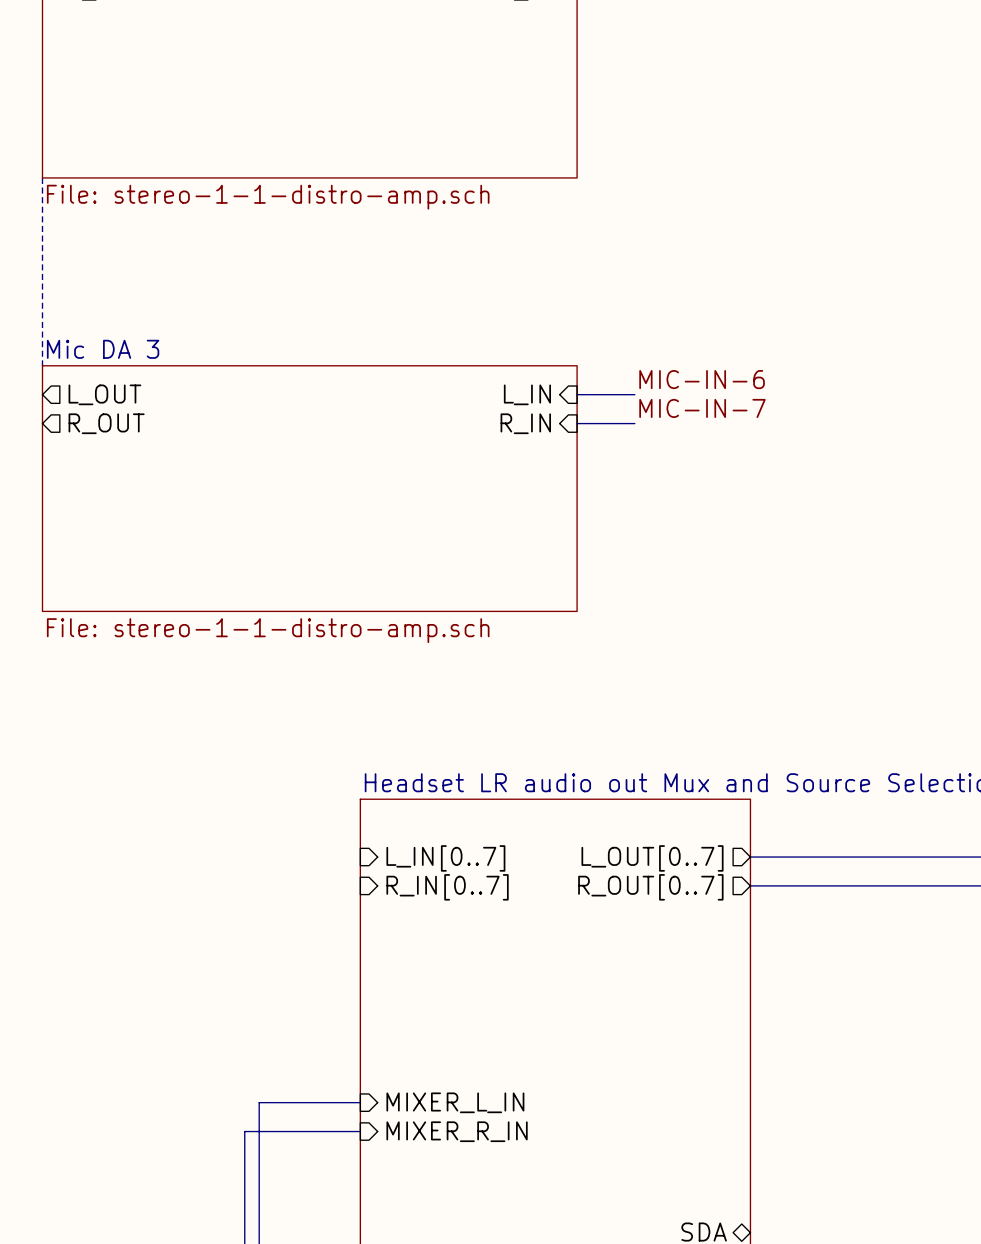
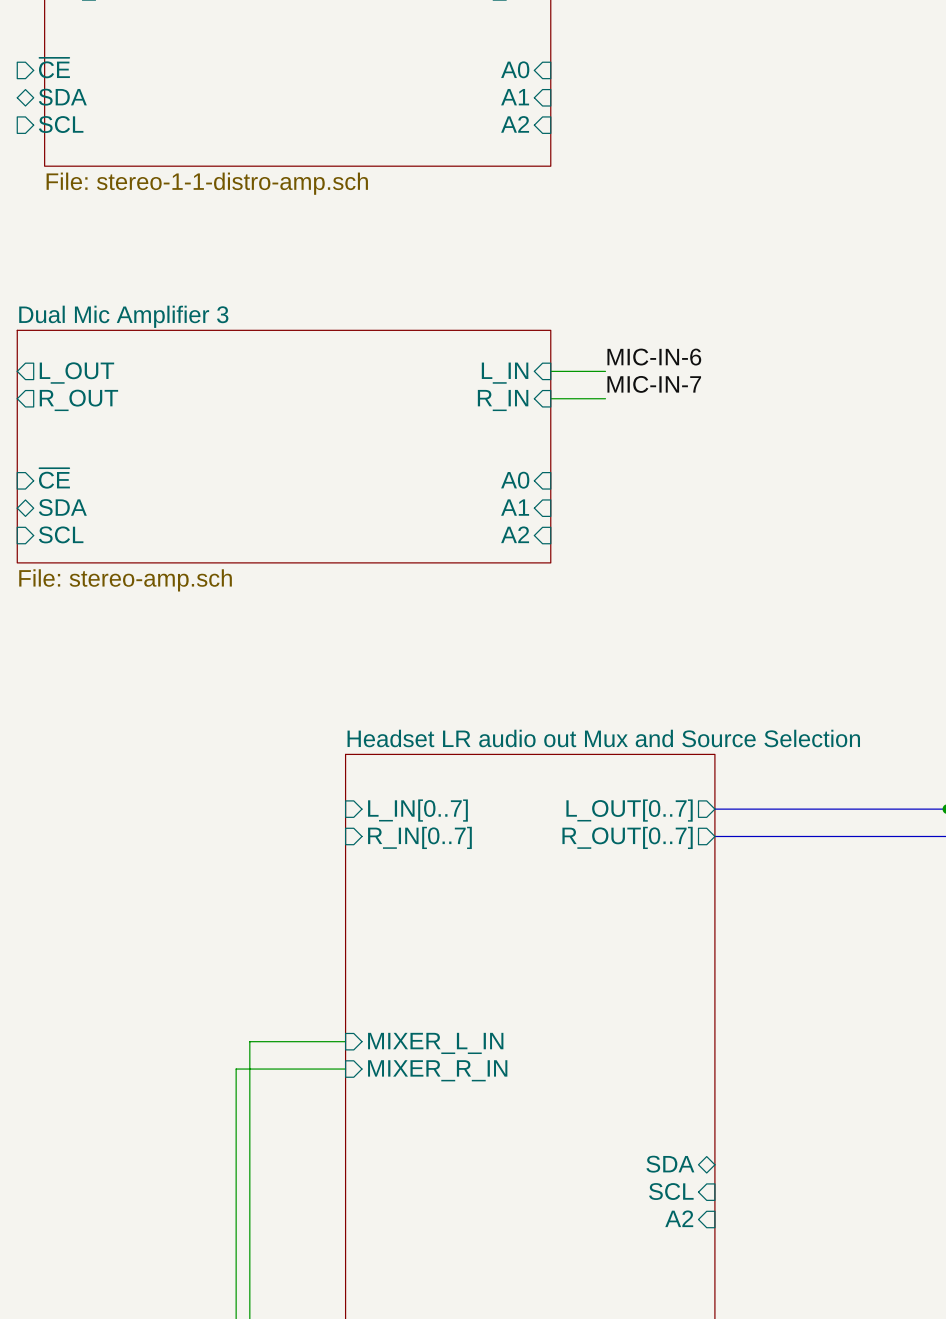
sheet pin: none -> ~{CE} (54, 68)
sheet pin: none -> A0 (515, 69)
sheet pin: none -> SDA (62, 97)
sheet pin: none -> A1 (515, 97)
sheet pin: none -> SCL (61, 124)
sheet pin: none -> A2 (515, 124)
line: (42, 177) (42, 365) -> none
sheet pin position: L_OUT (104, 394) -> L_OUT (76, 373)
sheet pin position: R_OUT (106, 423) -> R_OUT (78, 400)
sheet Dual Mic Amplifier 3: none -> File: stereo-amp.sch (284, 446)
sheet Mic DA 3: File: stereo-1-1-distro-amp.sch (309, 488) -> none
sheet pin: none -> ~{CE} (54, 478)
sheet pin: none -> A0 (515, 480)
sheet pin: none -> SDA (62, 507)
sheet pin: none -> A1 (515, 507)
sheet pin: none -> SCL (61, 534)
sheet pin: none -> A2 (515, 534)

